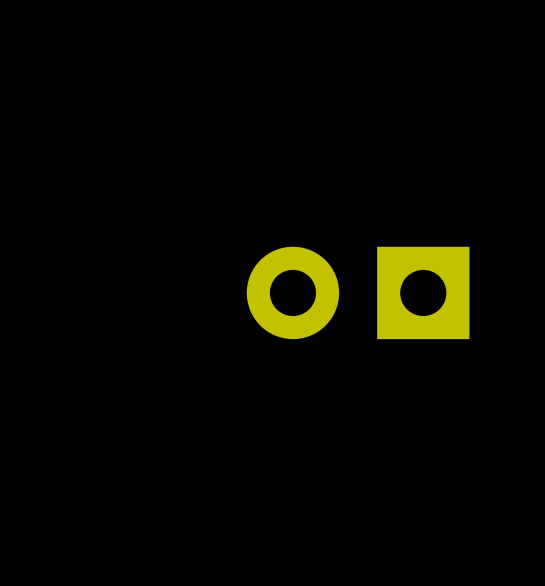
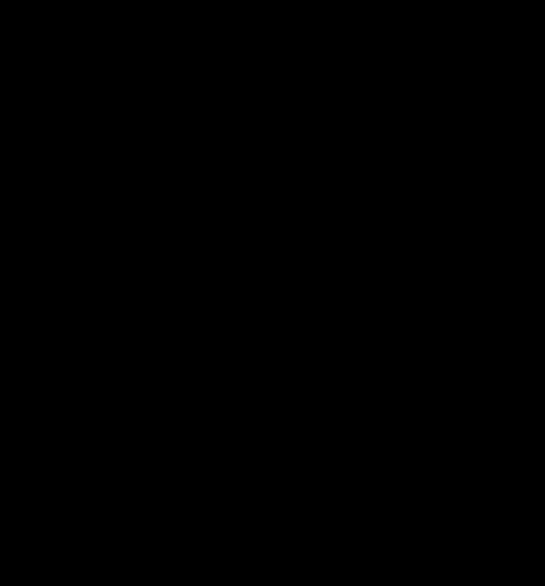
part: (358, 292) -> none

